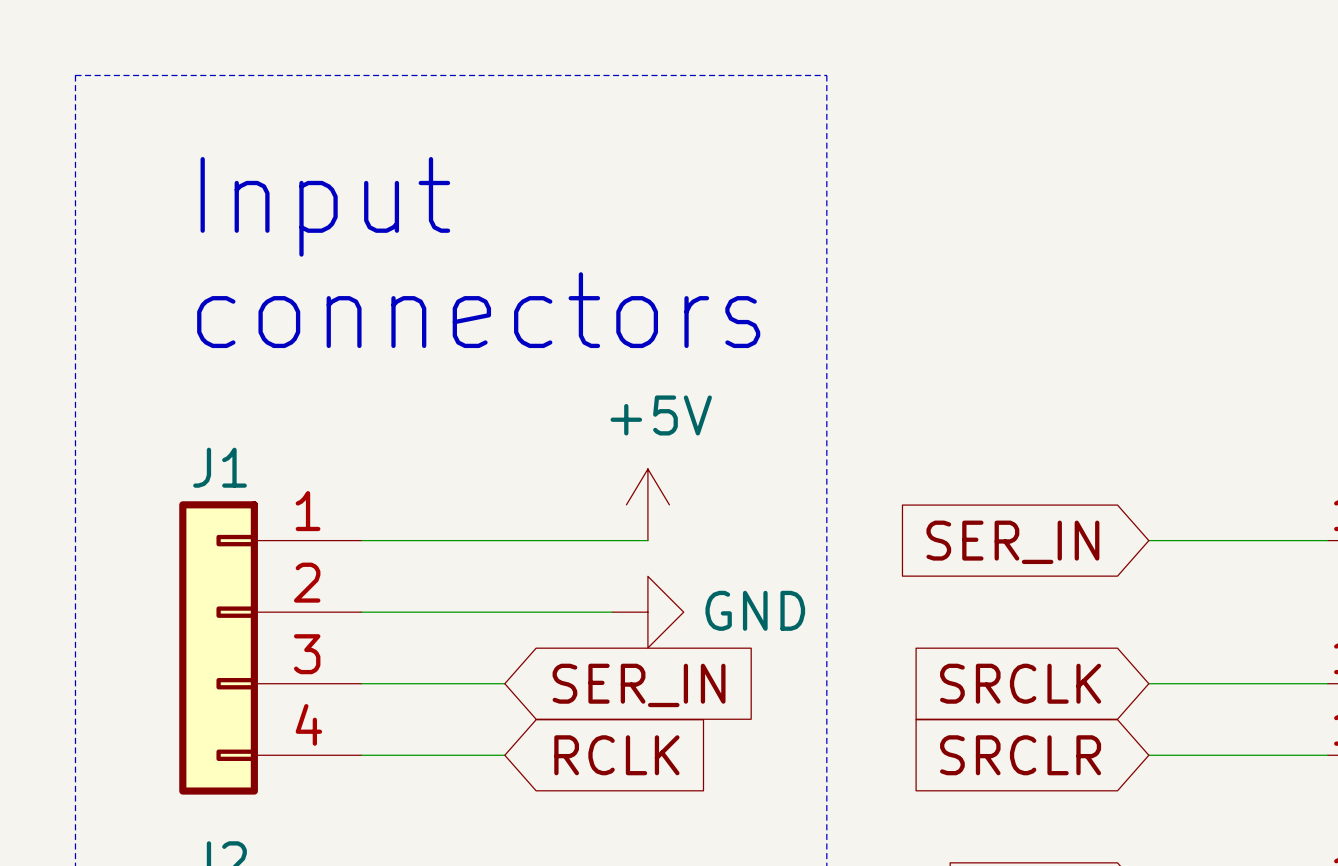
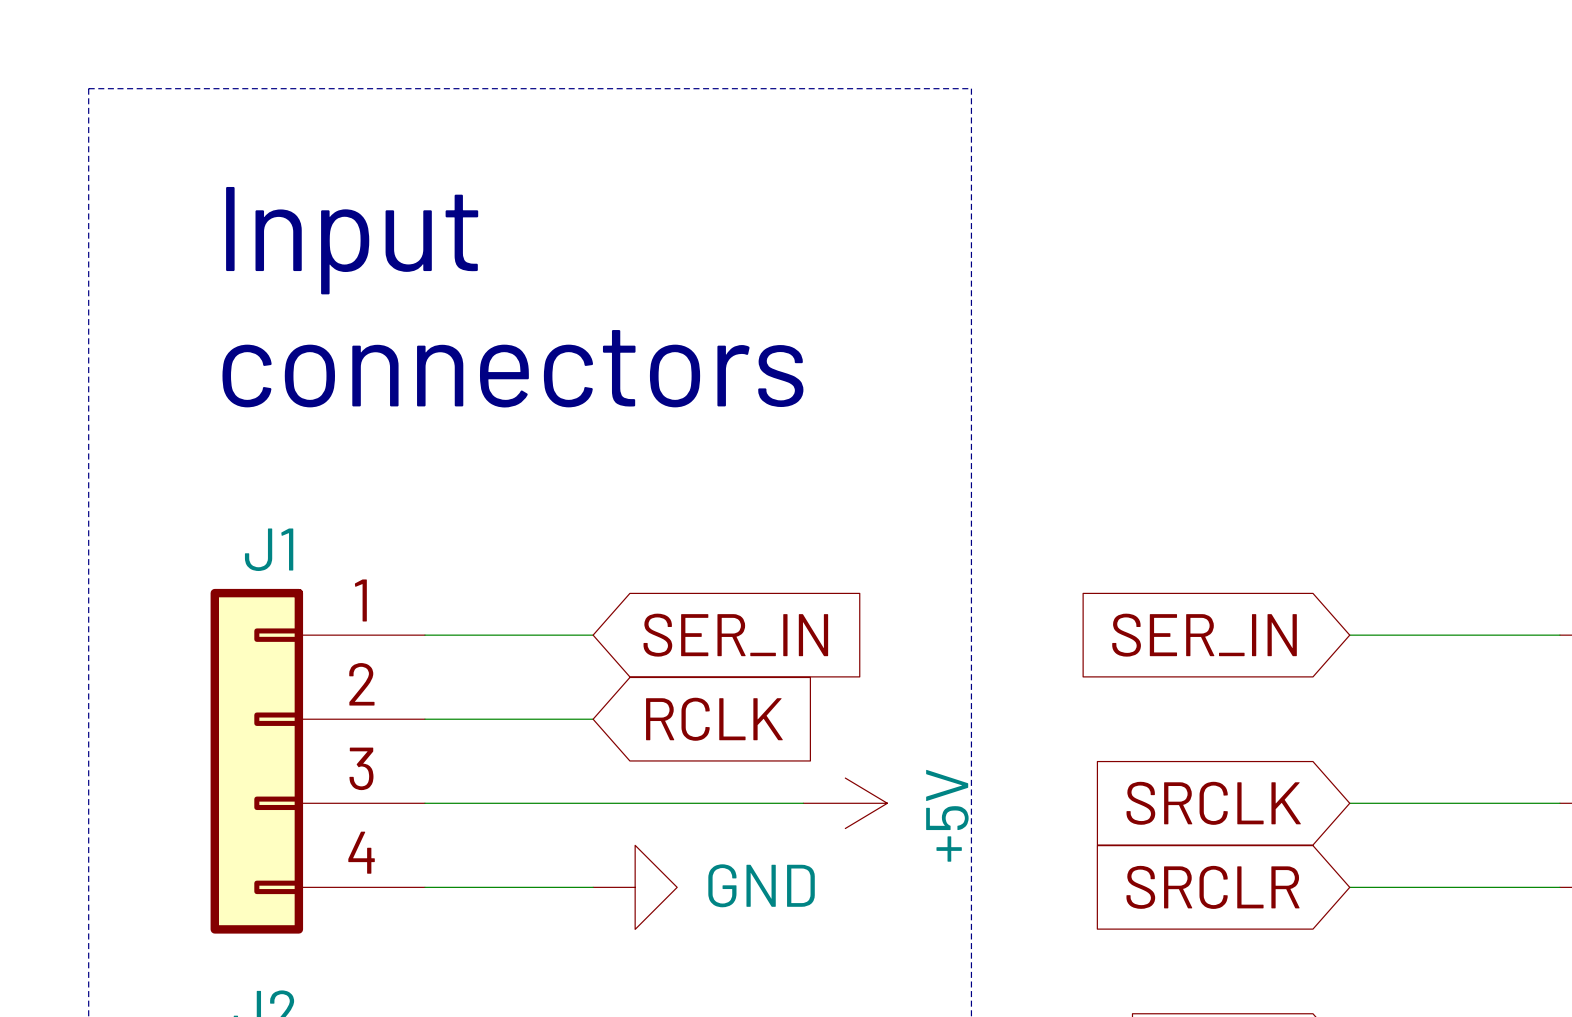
power symbol rotation: 0° (647, 504) -> 90° clockwise (845, 803)
power symbol position: +5V (647, 504) -> +5V (845, 803)
wire: (504, 540) (647, 540) -> none
wire: (504, 612) (612, 612) -> none
power symbol position: GND (647, 612) -> GND (635, 887)
wire: none -> (593, 803) (803, 803)
global label position: SER_IN (639, 685) -> SER_IN (735, 635)
global label position: RCLK (616, 755) -> RCLK (714, 719)

